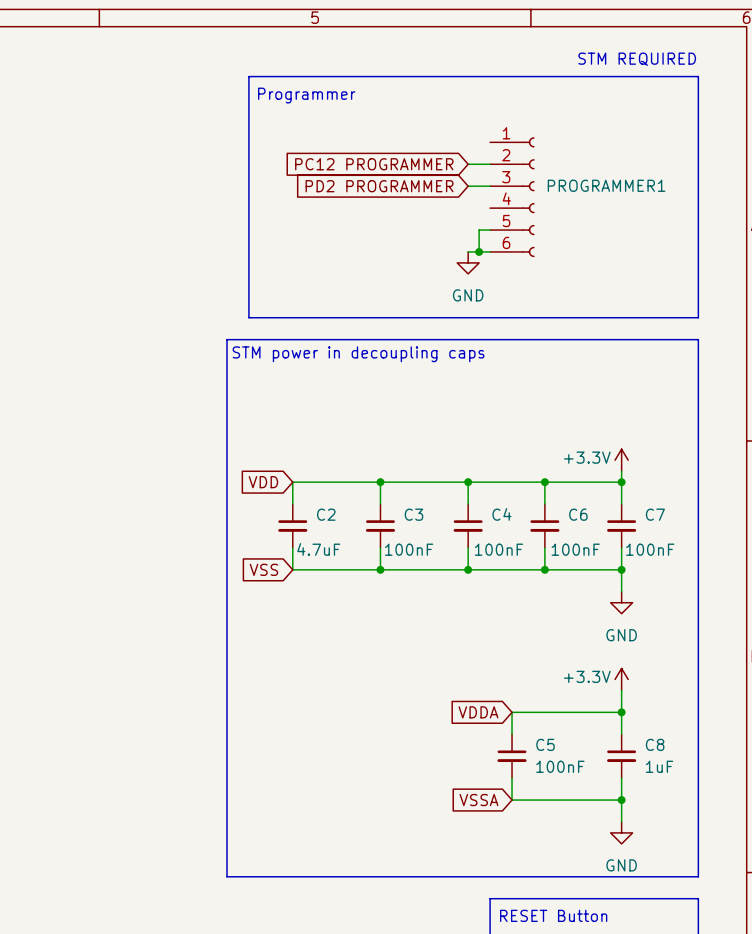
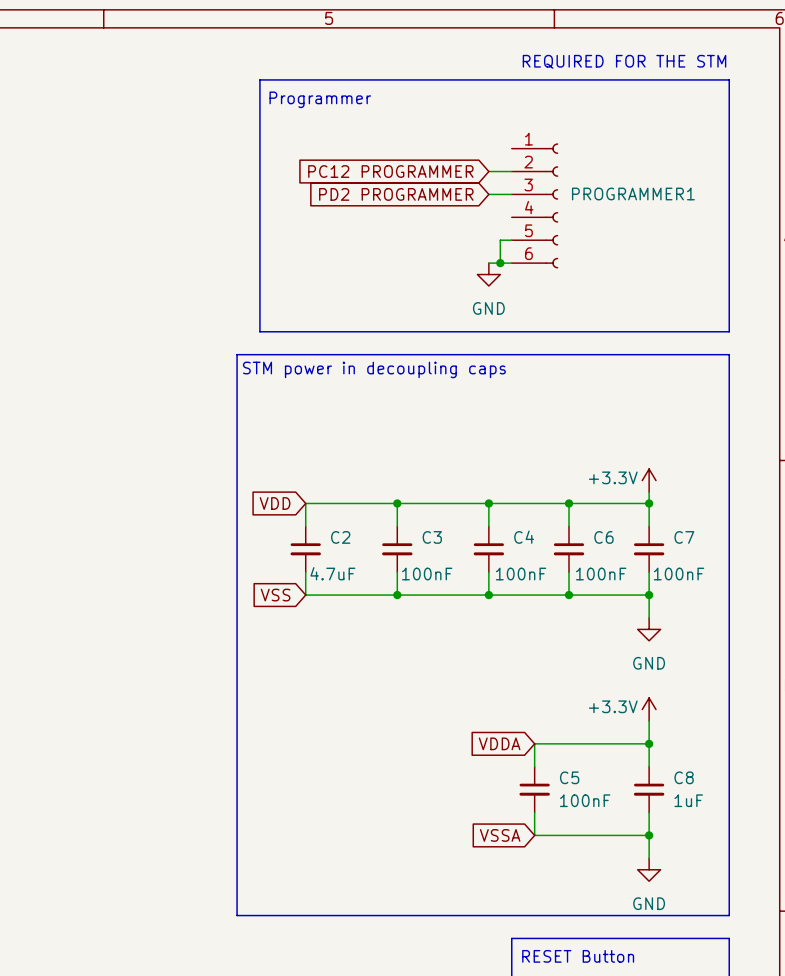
text: STM REQUIRED (637, 59) -> REQUIRED FOR THE STM (624, 61)

